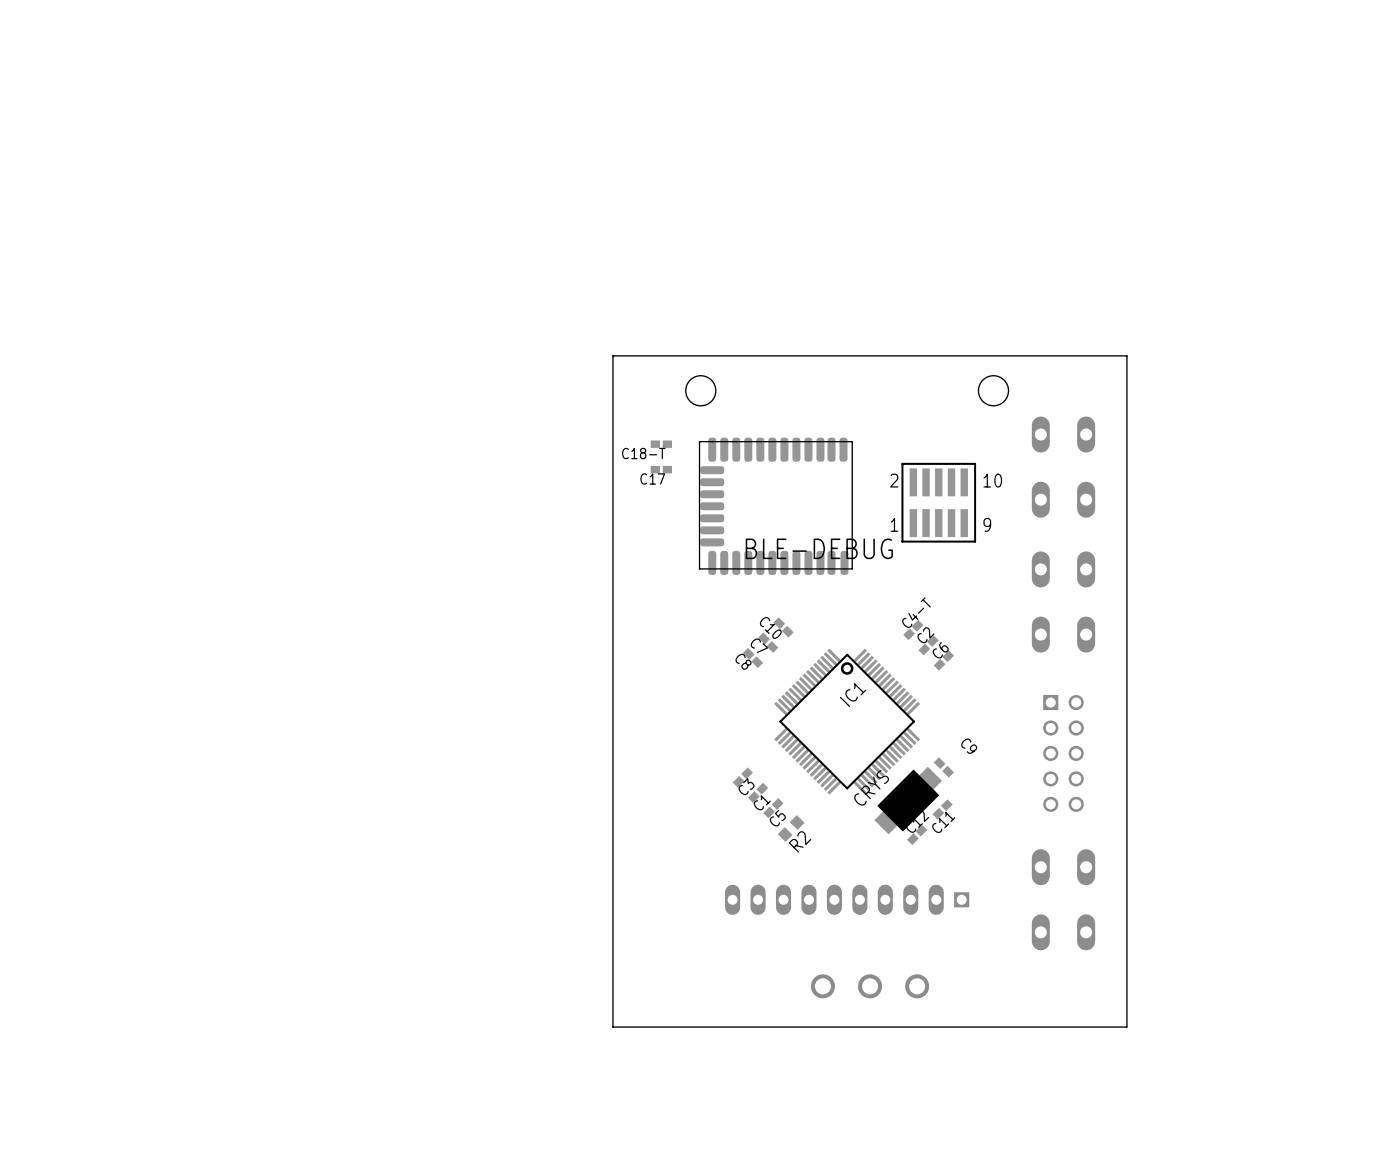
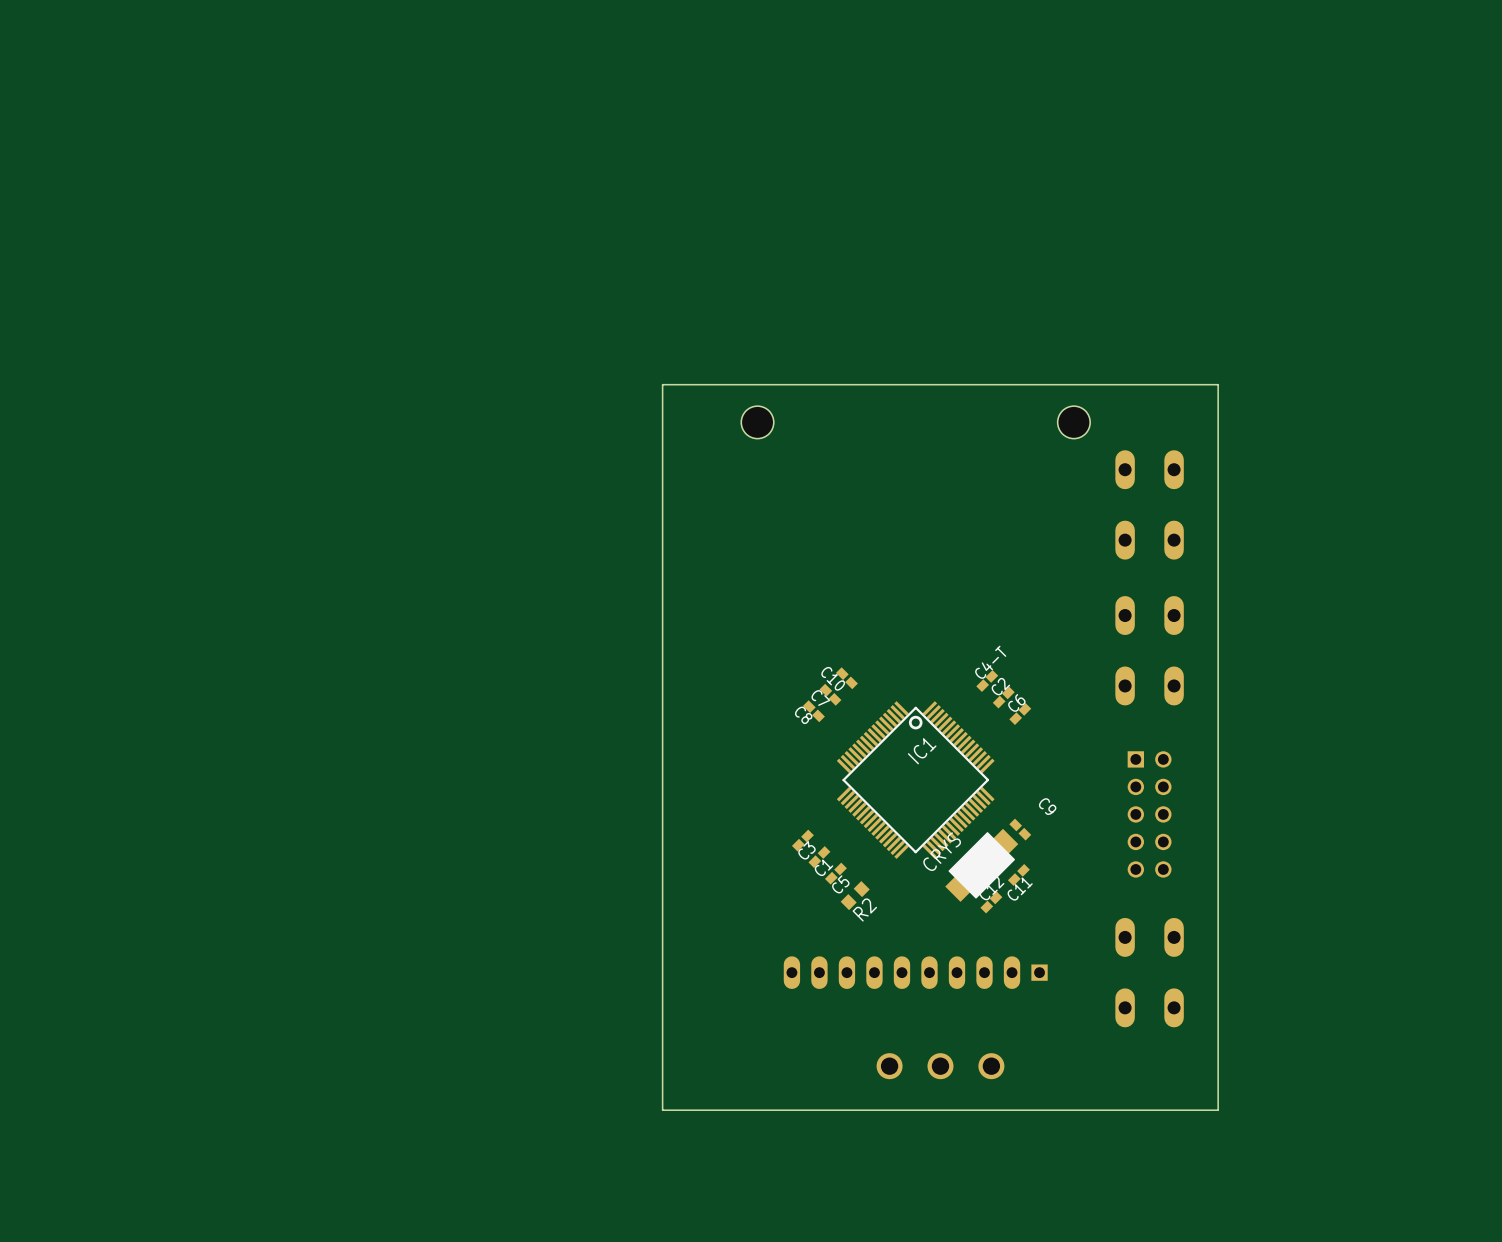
C18-T: (661, 444) -> none
C17: (661, 469) -> none
BLE-DEBUG: (938, 502) -> none
part: (775, 506) -> none

